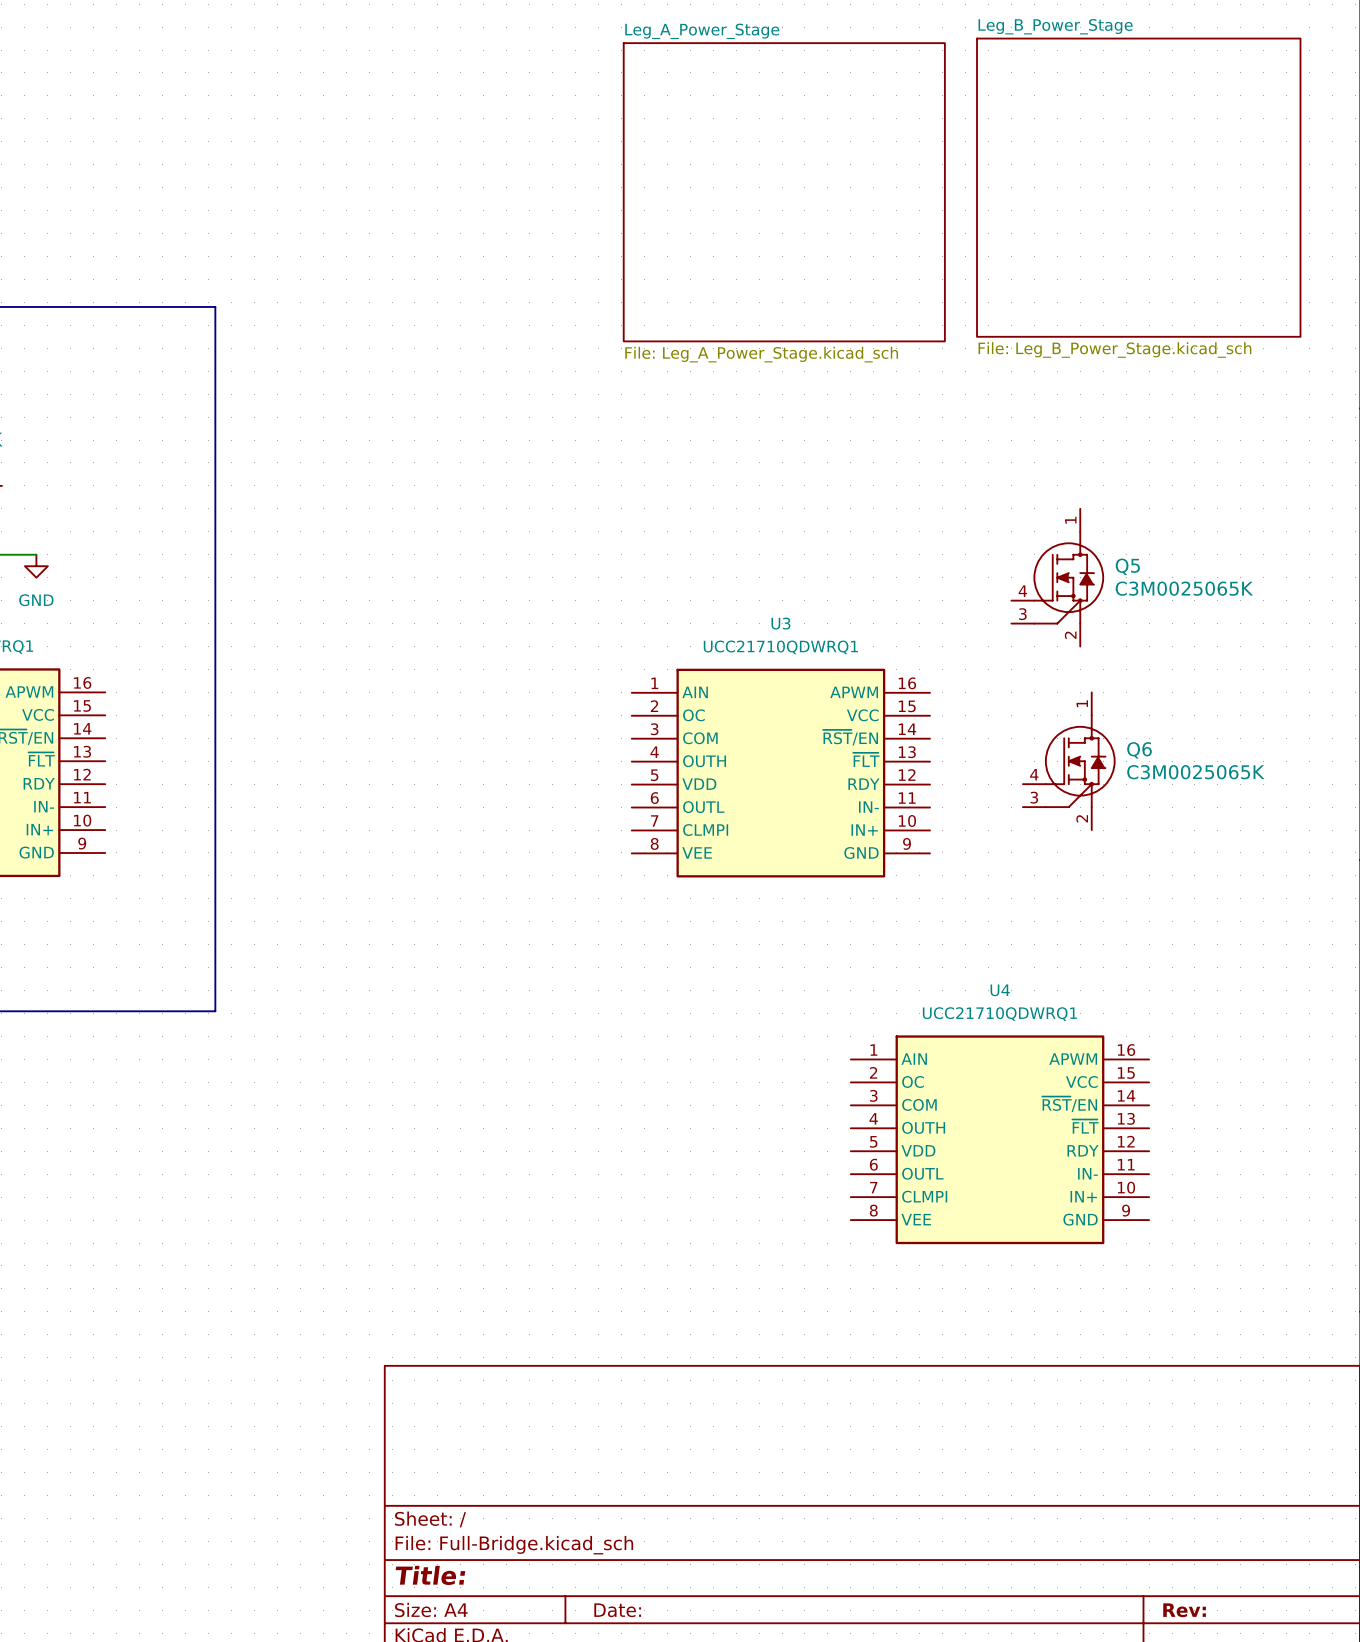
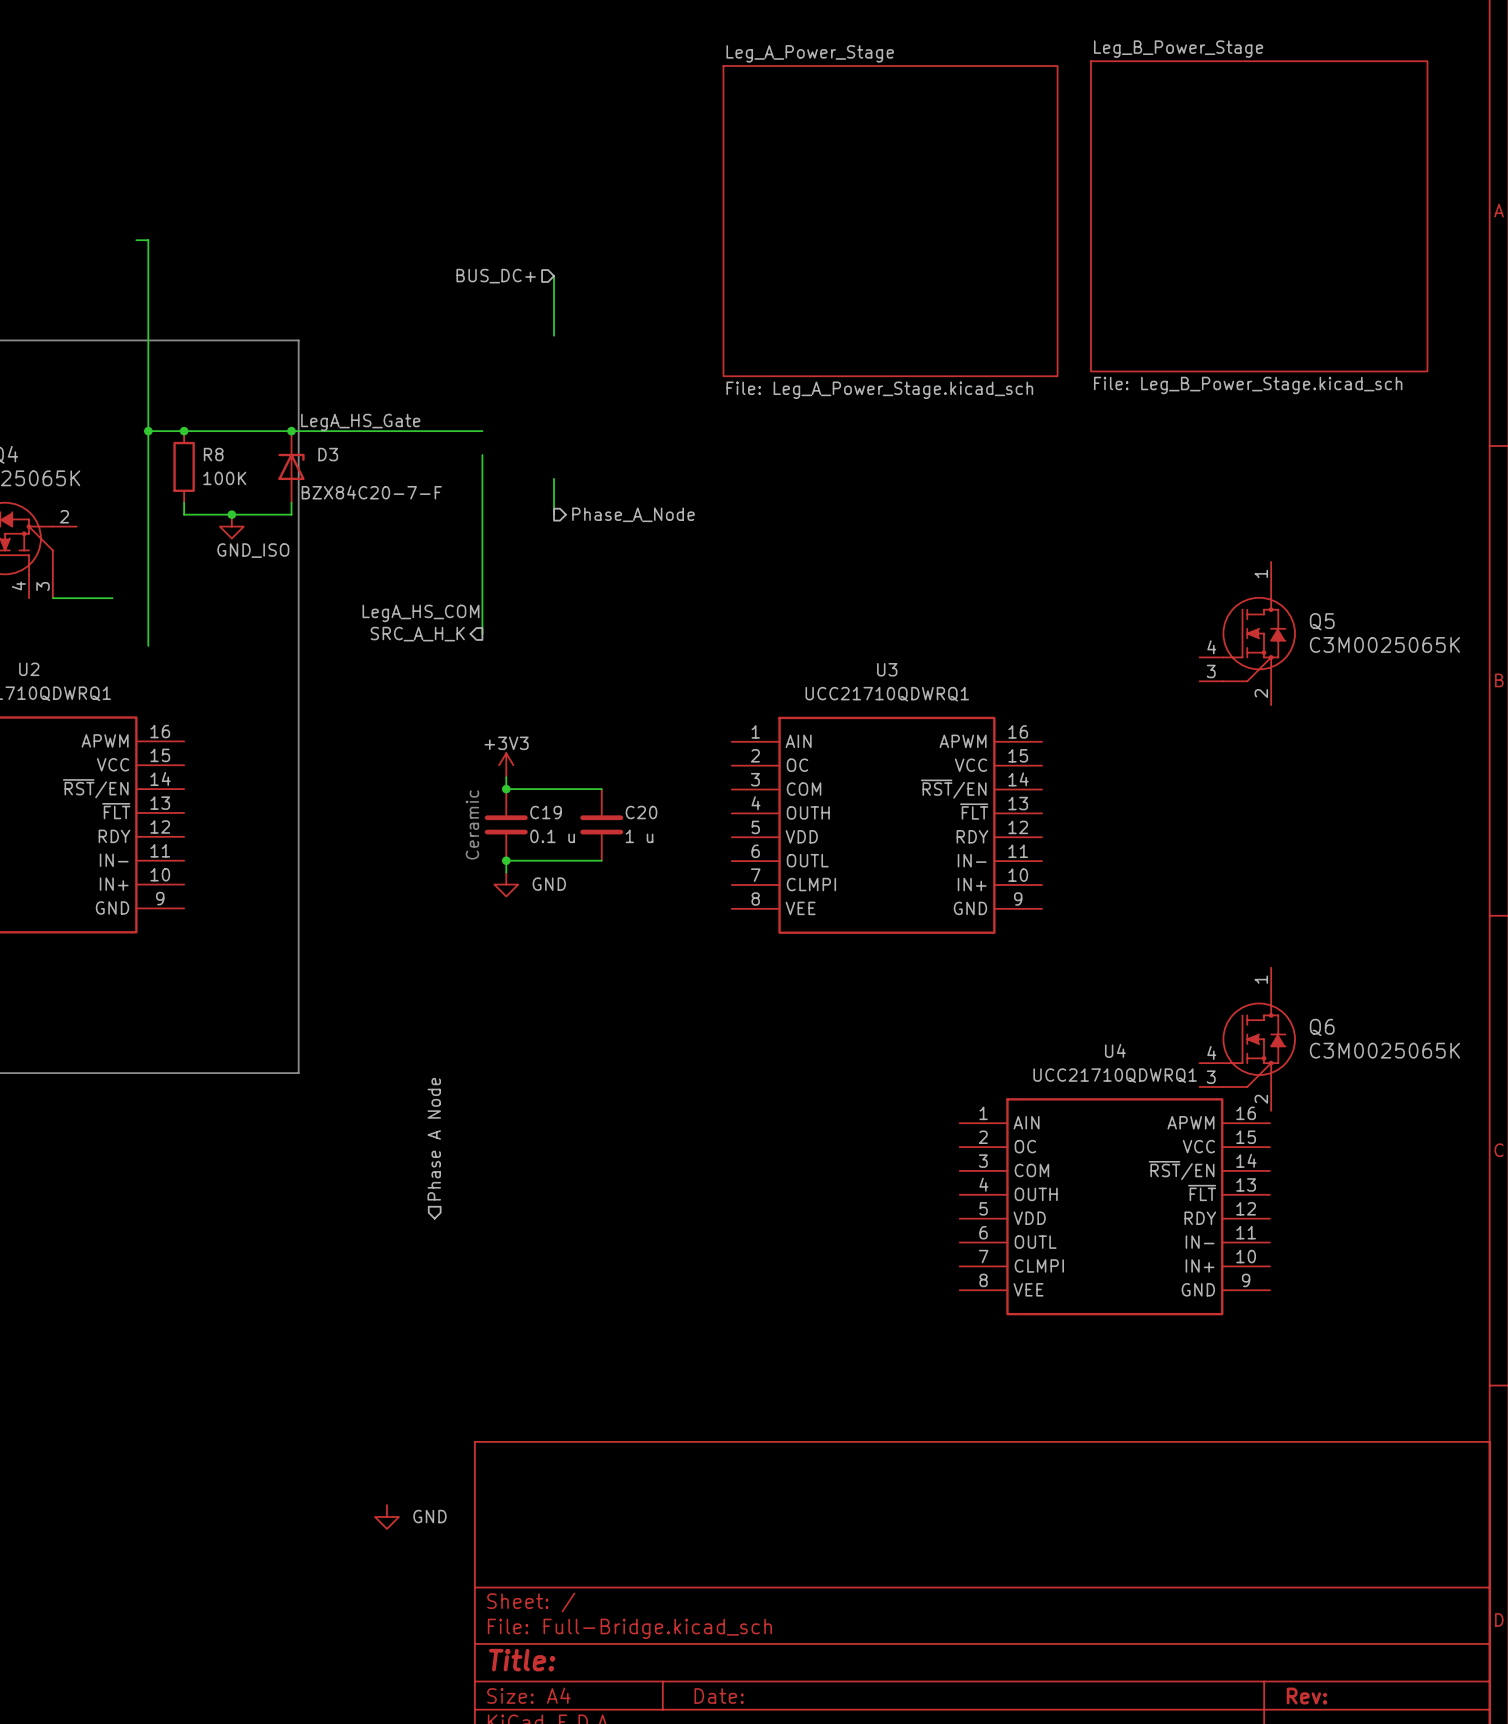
wire: none -> (136, 240) (148, 240) (148, 645)
wire: none -> (554, 276) (554, 335)
hierarchical label: none -> BUS_DC+ (496, 276)
label: none -> LegA_HS_Gate (360, 422)
wire: none -> (148, 431) (482, 431)
junction: none -> (148, 431)
junction: none -> (184, 431)
junction: none -> (291, 431)
wire: none -> (482, 454) (482, 633)
R8: none -> 100K (184, 466)
D3: none -> BZX84C20-7-F (291, 466)
wire: none -> (554, 478) (554, 514)
wire: none -> (184, 502) (184, 514) (291, 514) (291, 502)
junction: none -> (231, 514)
hierarchical label: none -> Phase_A_Node (633, 514)
power symbol: none -> GND_ISO (231, 526)
power symbol: GND (36, 566) -> none
label: none -> LegA_HS_COM (420, 613)
Q5 position: (1057, 577) -> (1247, 633)
hierarchical label: none -> SRC_A_H_K (417, 634)
power symbol: none -> +3V3 (506, 765)
wire: none -> (506, 777) (506, 789) (601, 789)
junction: none -> (506, 789)
Q6 position: (1069, 761) -> (1247, 1039)
text: none -> Ceramic (472, 824)
C19: none -> 0.1 u (506, 824)
C20: none -> 1 u (601, 824)
junction: none -> (506, 860)
wire: none -> (601, 860) (506, 860) (506, 872)
power symbol: none -> GND (506, 884)
hierarchical label: none -> Phase A Node (434, 1139)
power symbol: none -> GND (386, 1516)

